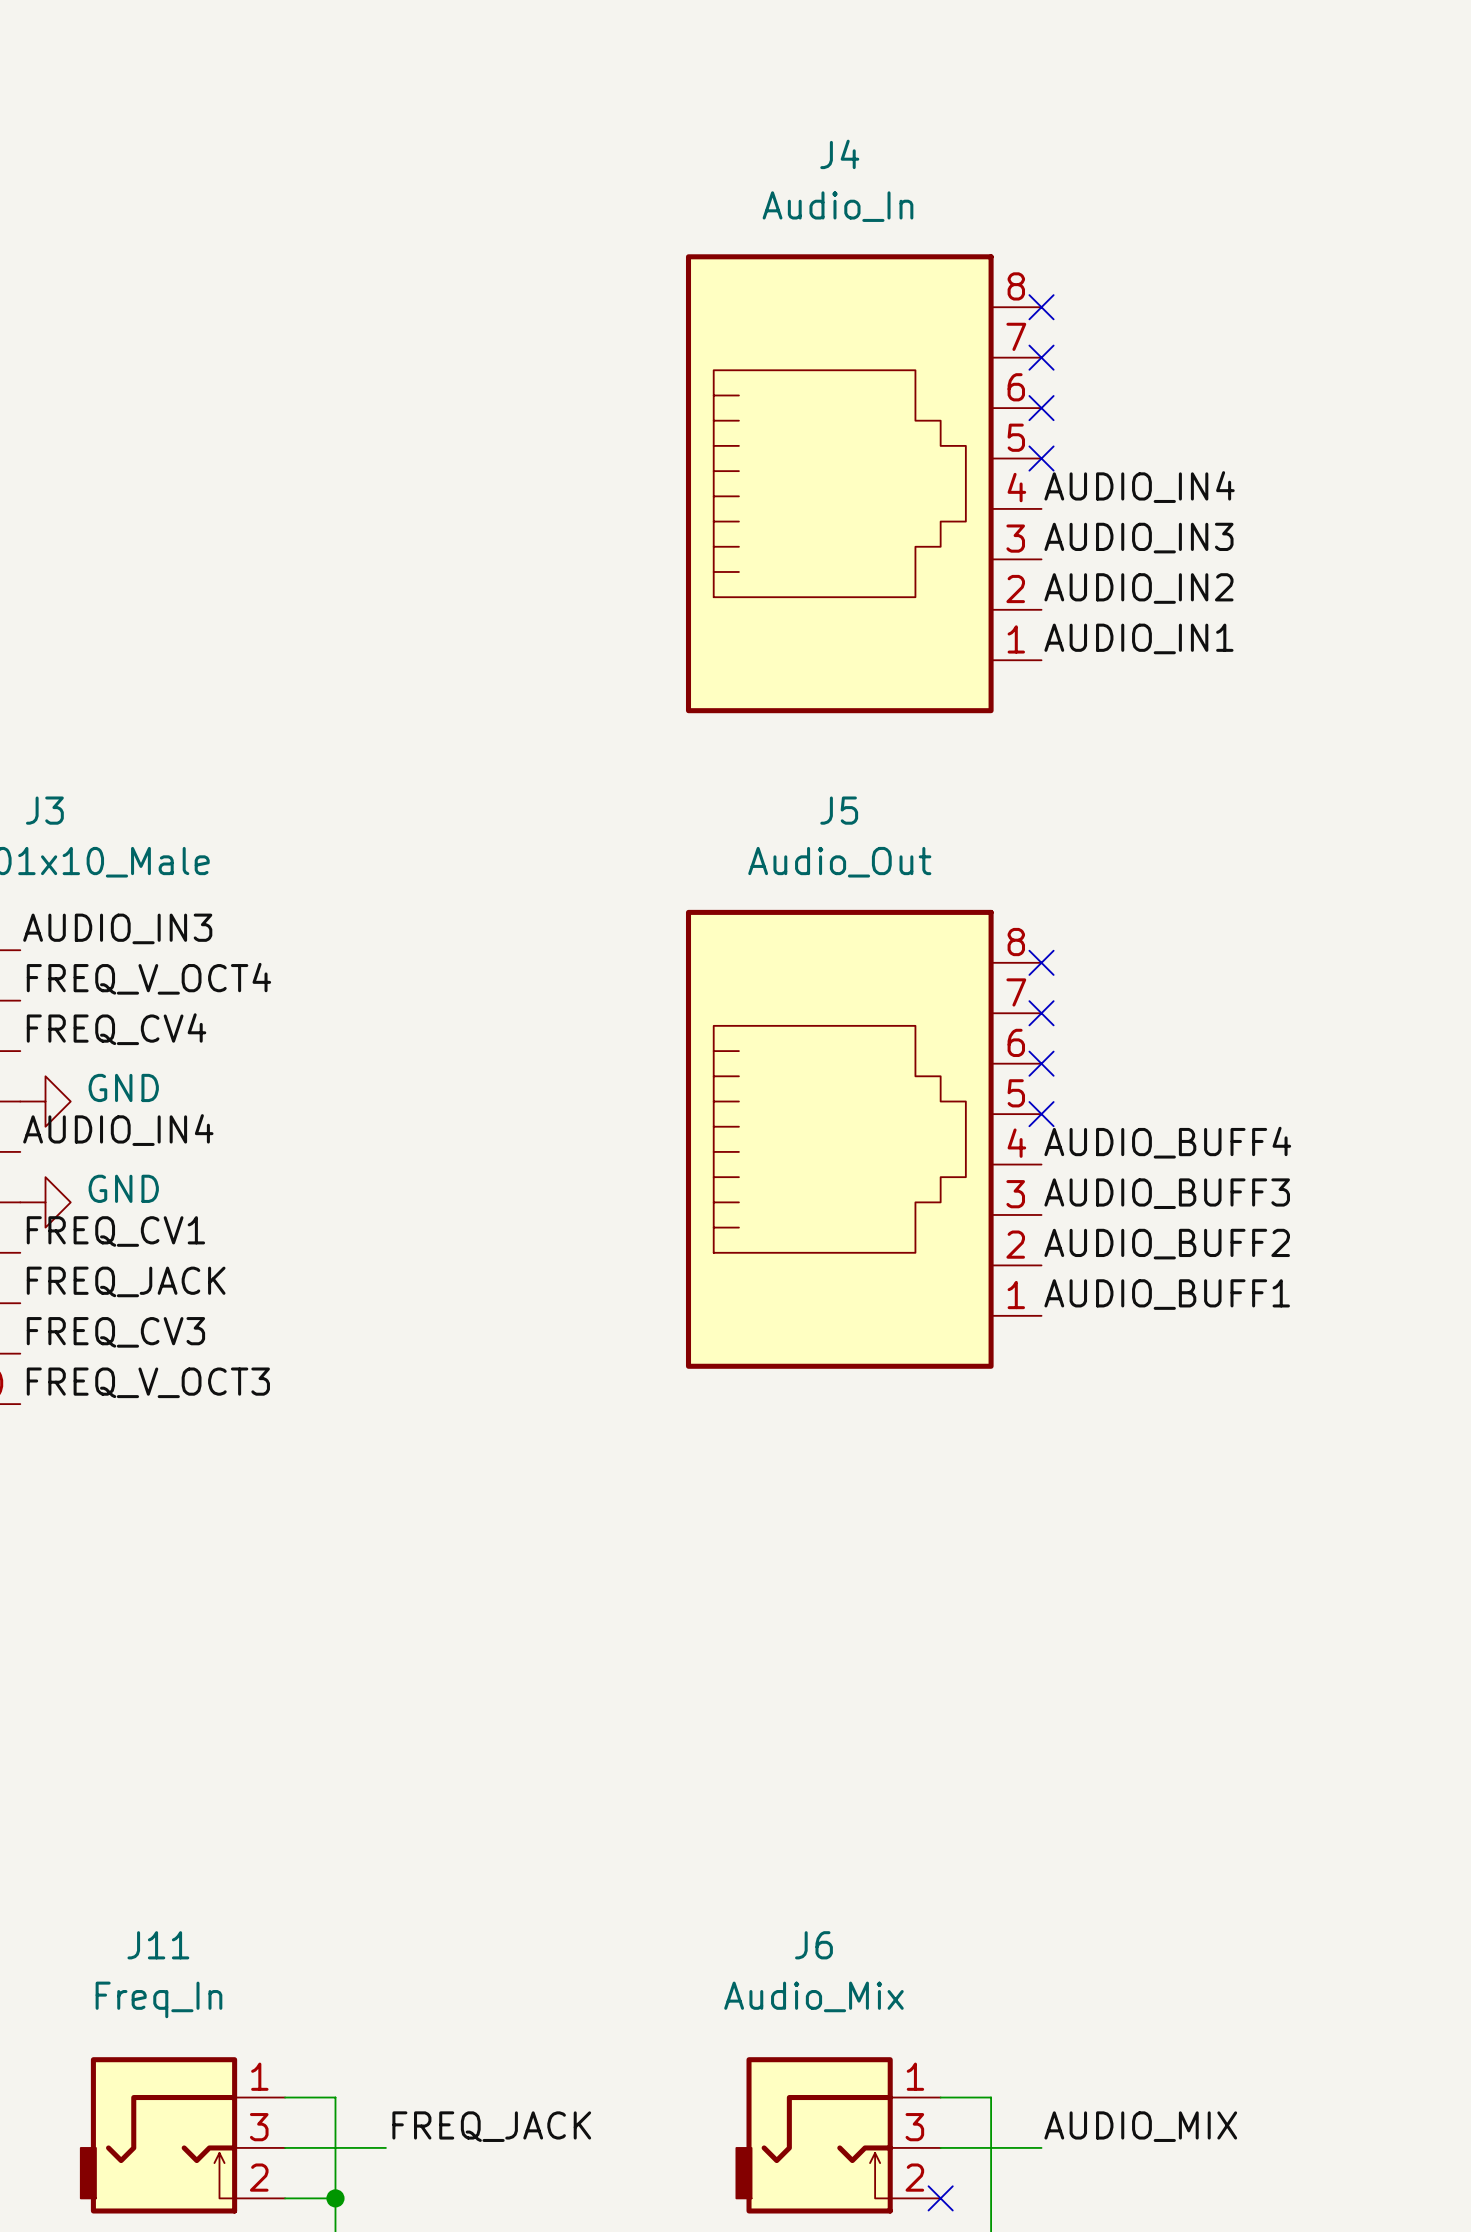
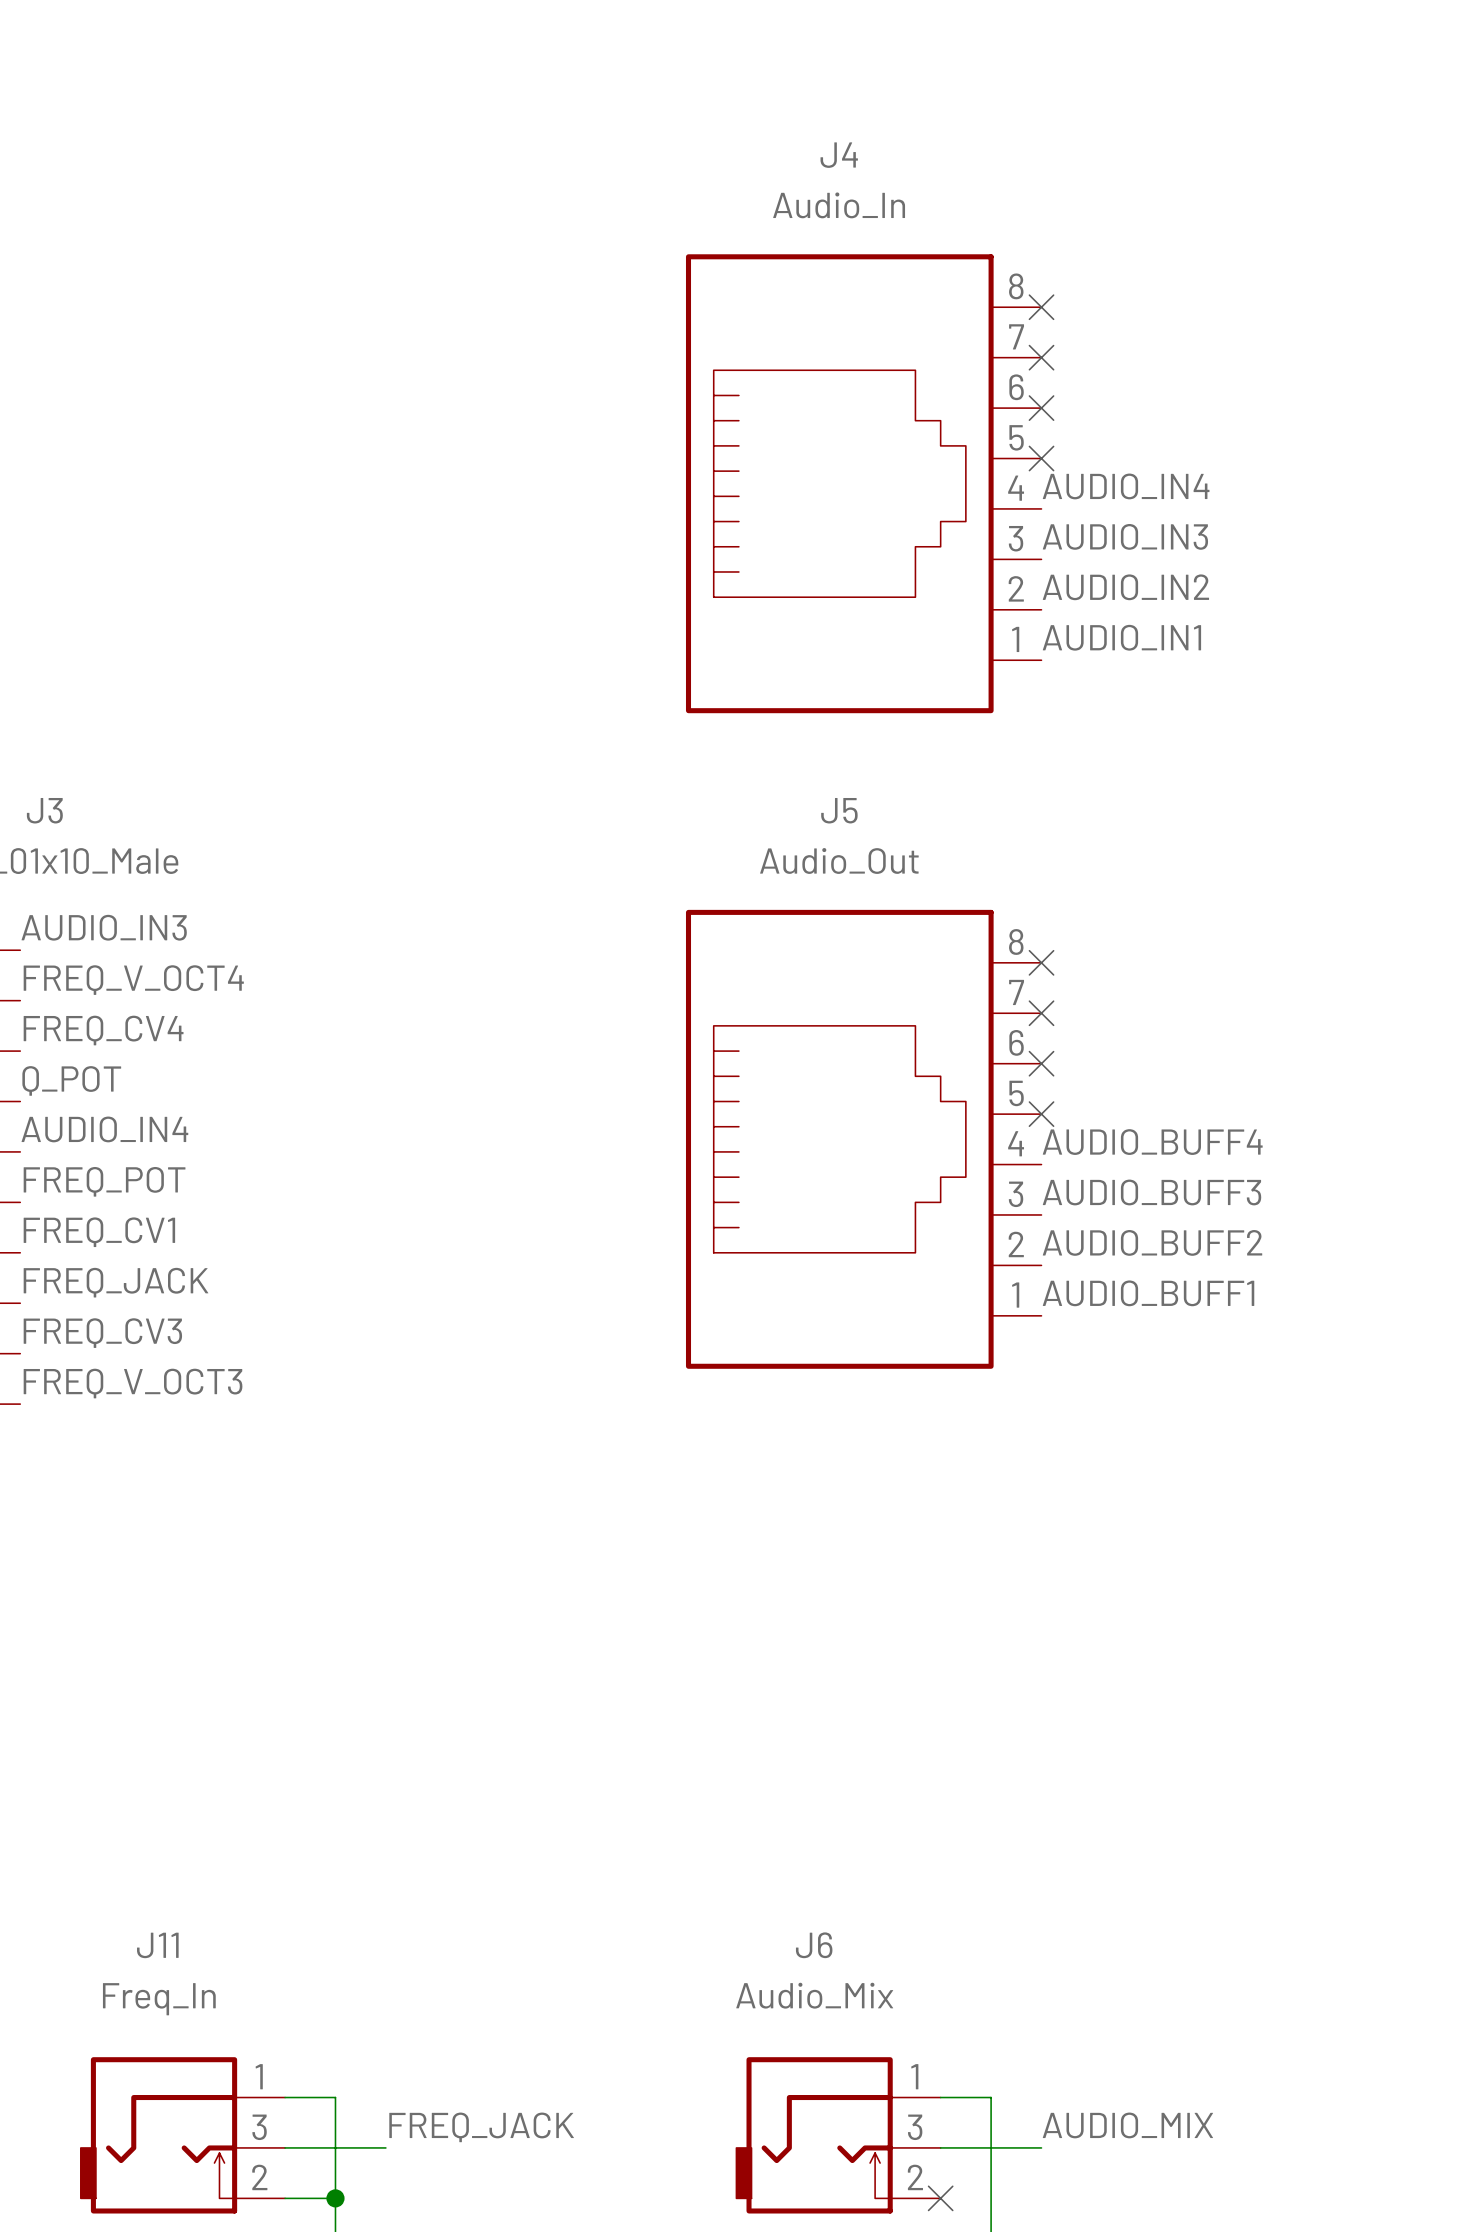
label: none -> Q_POT (71, 1080)
power symbol: GND (45, 1101) -> none
label: none -> FREQ_POT (104, 1181)
power symbol: GND (45, 1202) -> none

